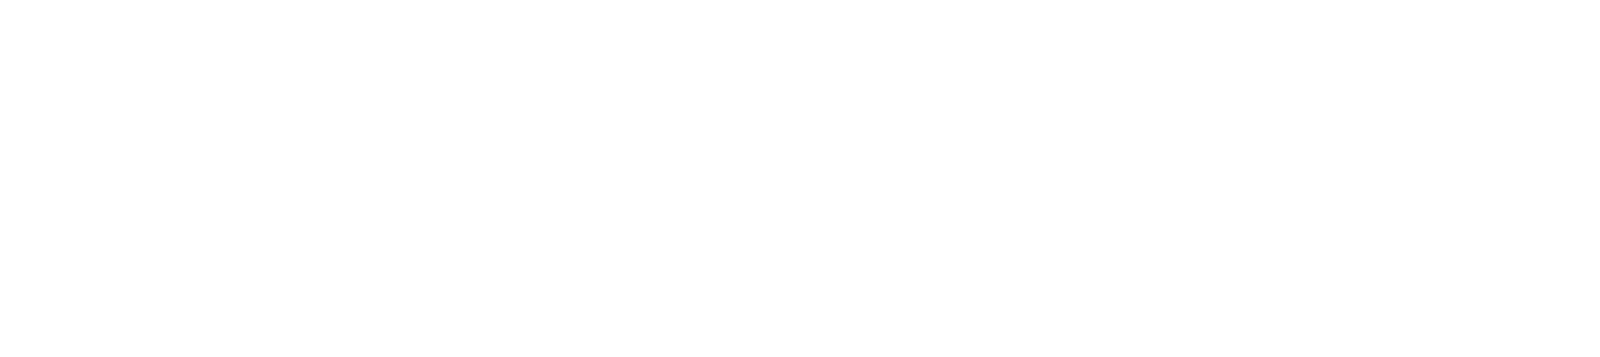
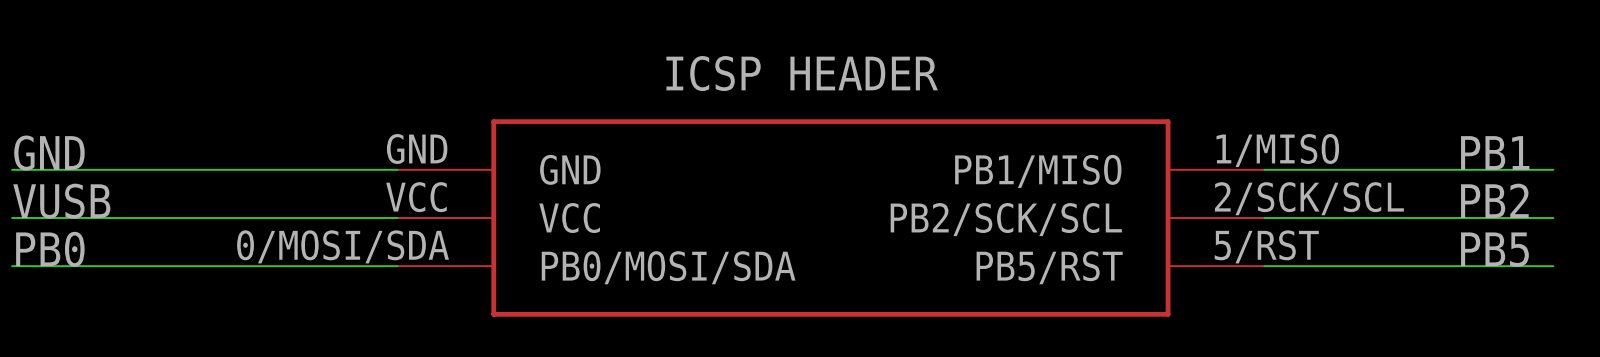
label: none -> GND (49, 153)
label: none -> PB1 (1495, 152)
wire: none -> (12, 169) (397, 169)
wire: none -> (1264, 169) (1553, 169)
label: none -> VUSB (61, 201)
label: none -> PB2 (1494, 200)
wire: none -> (12, 217) (397, 217)
part: none -> (830, 217)
wire: none -> (1264, 217) (1553, 217)
label: none -> PB0 (50, 249)
label: none -> PB5 (1494, 249)
wire: none -> (12, 266) (397, 266)
wire: none -> (1264, 266) (1553, 266)

